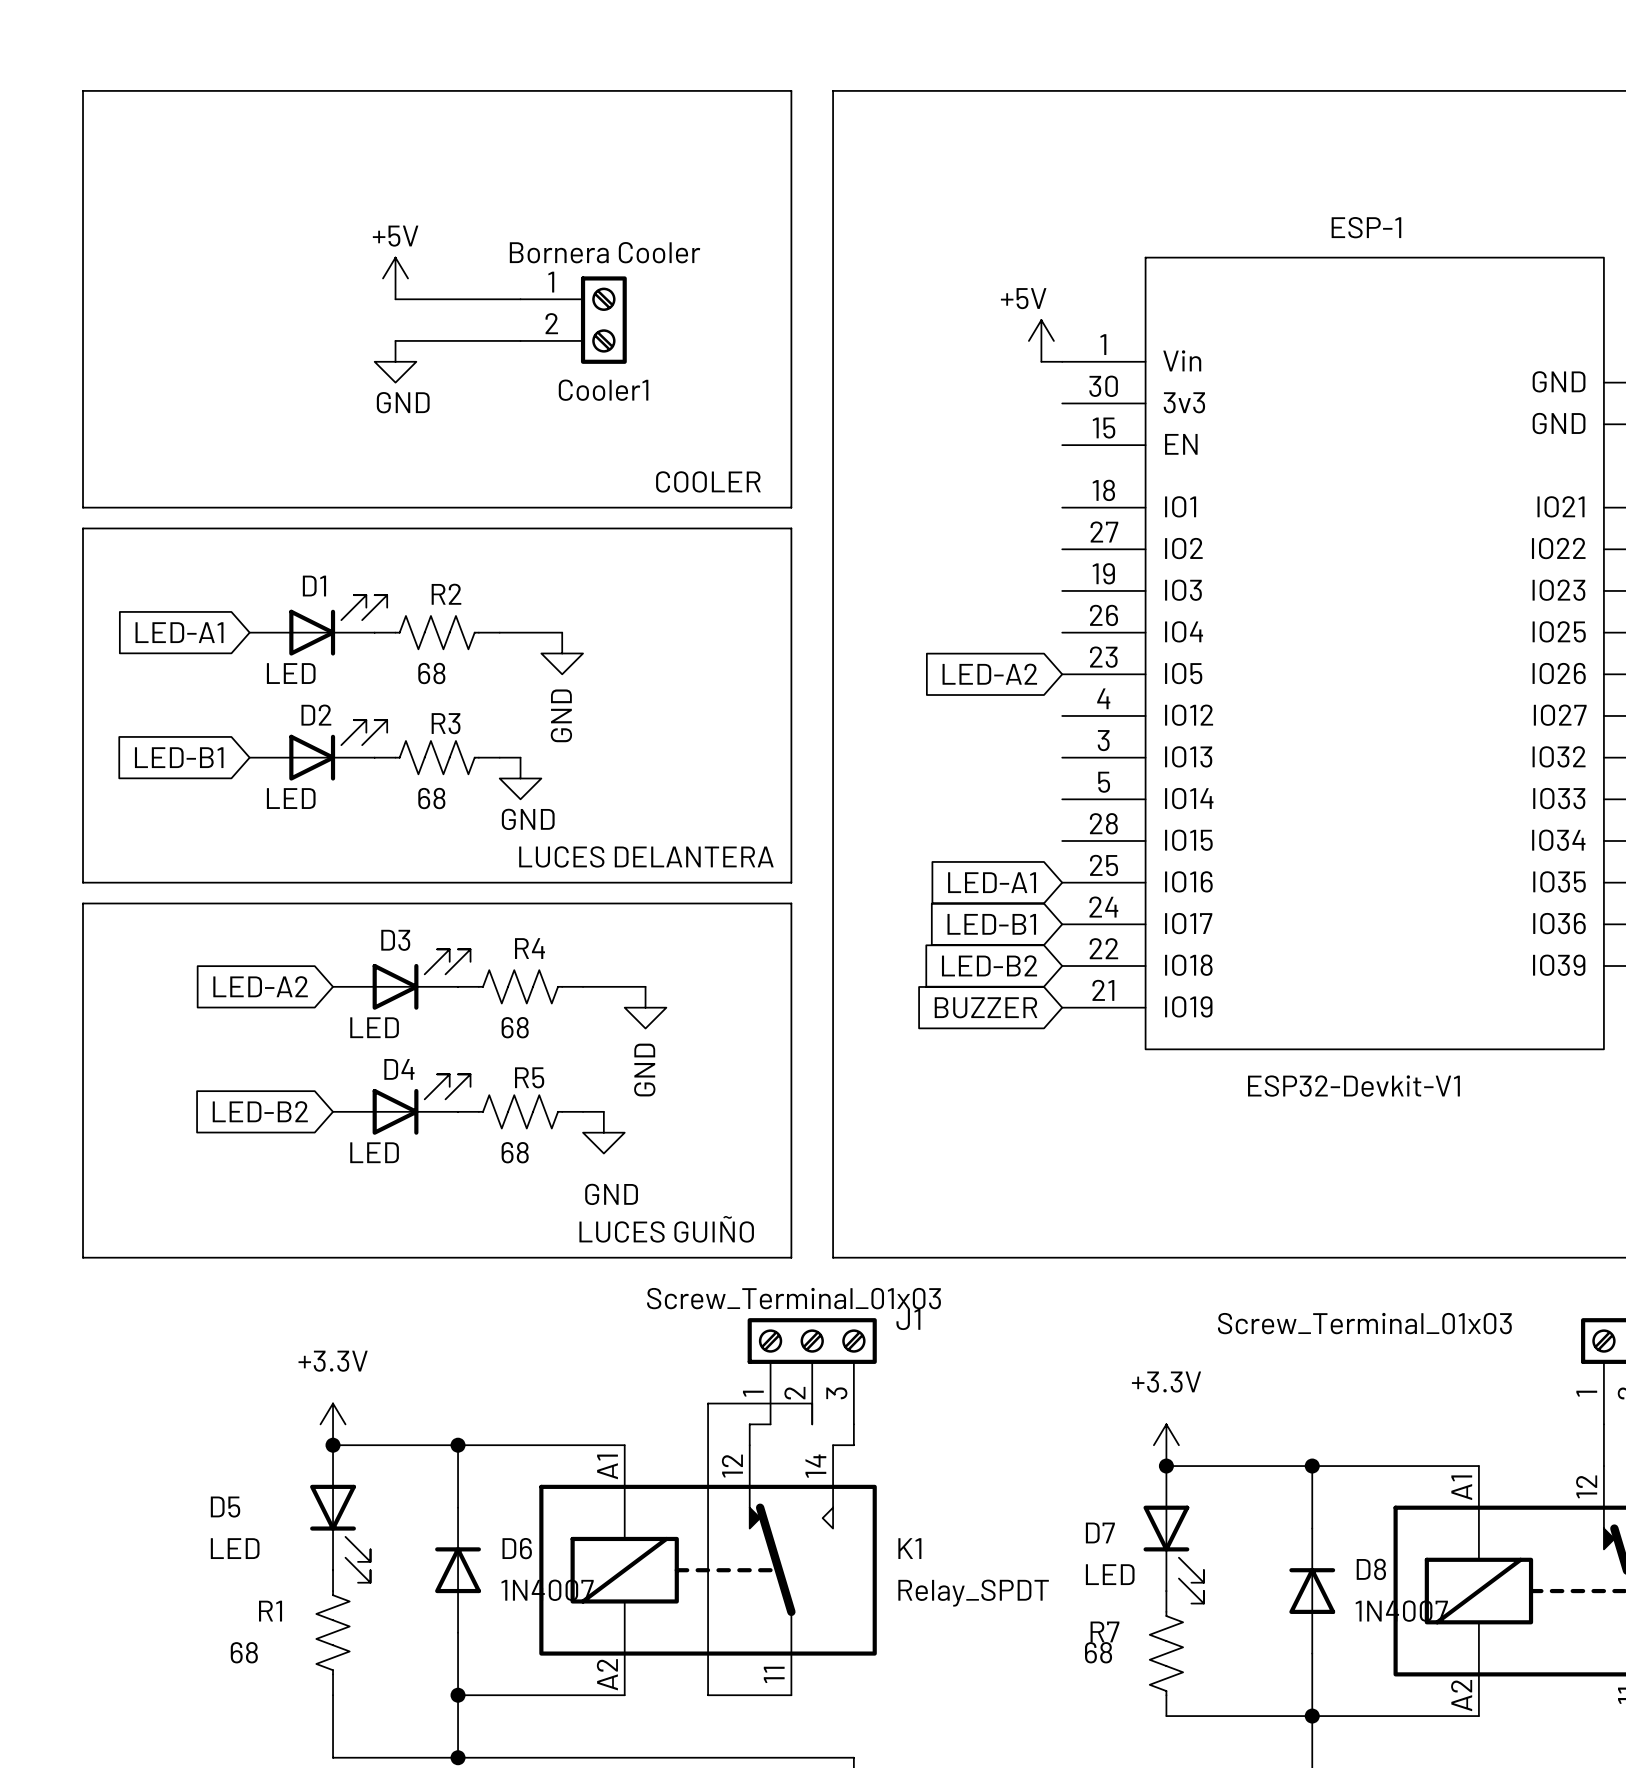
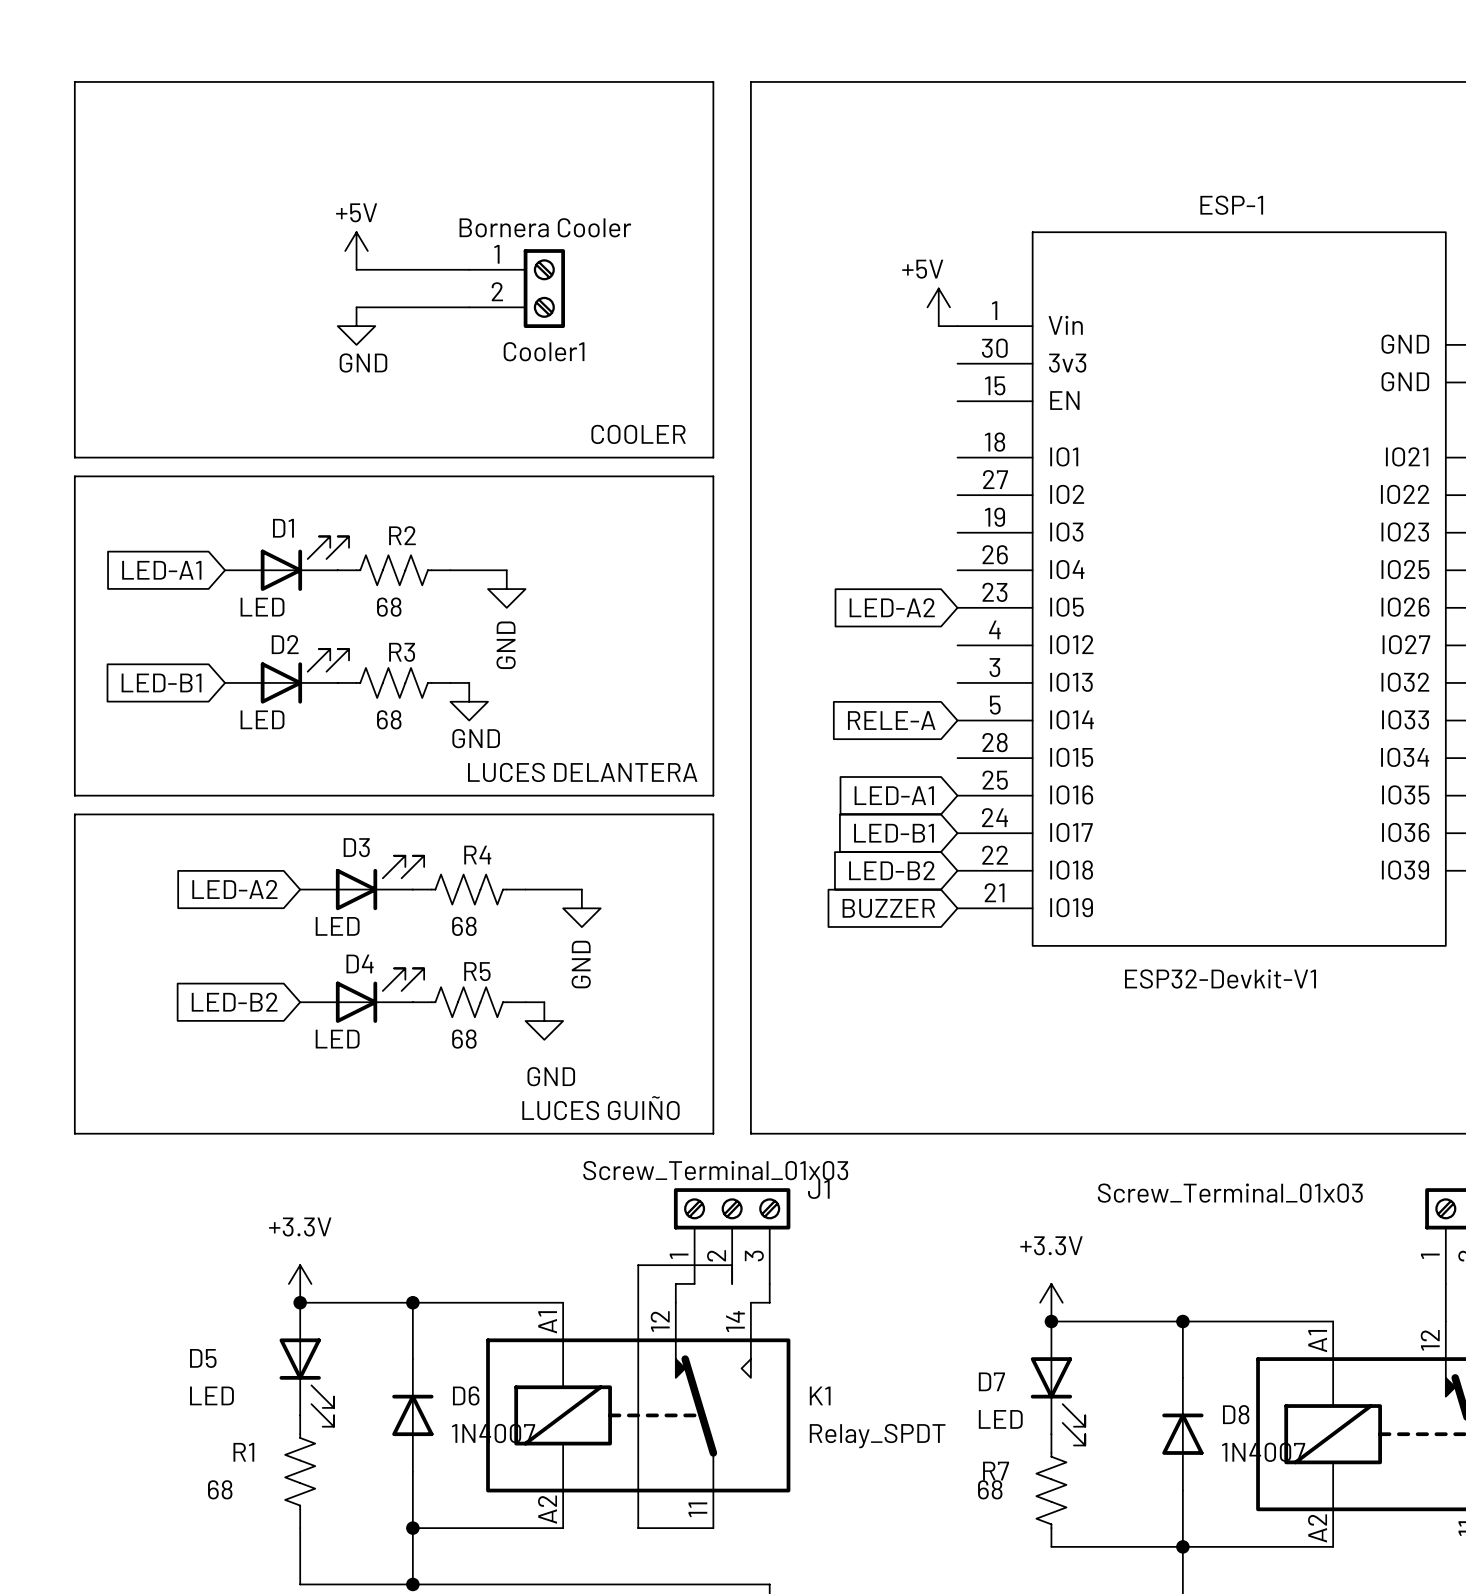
global label: none -> RELE-A (891, 720)

